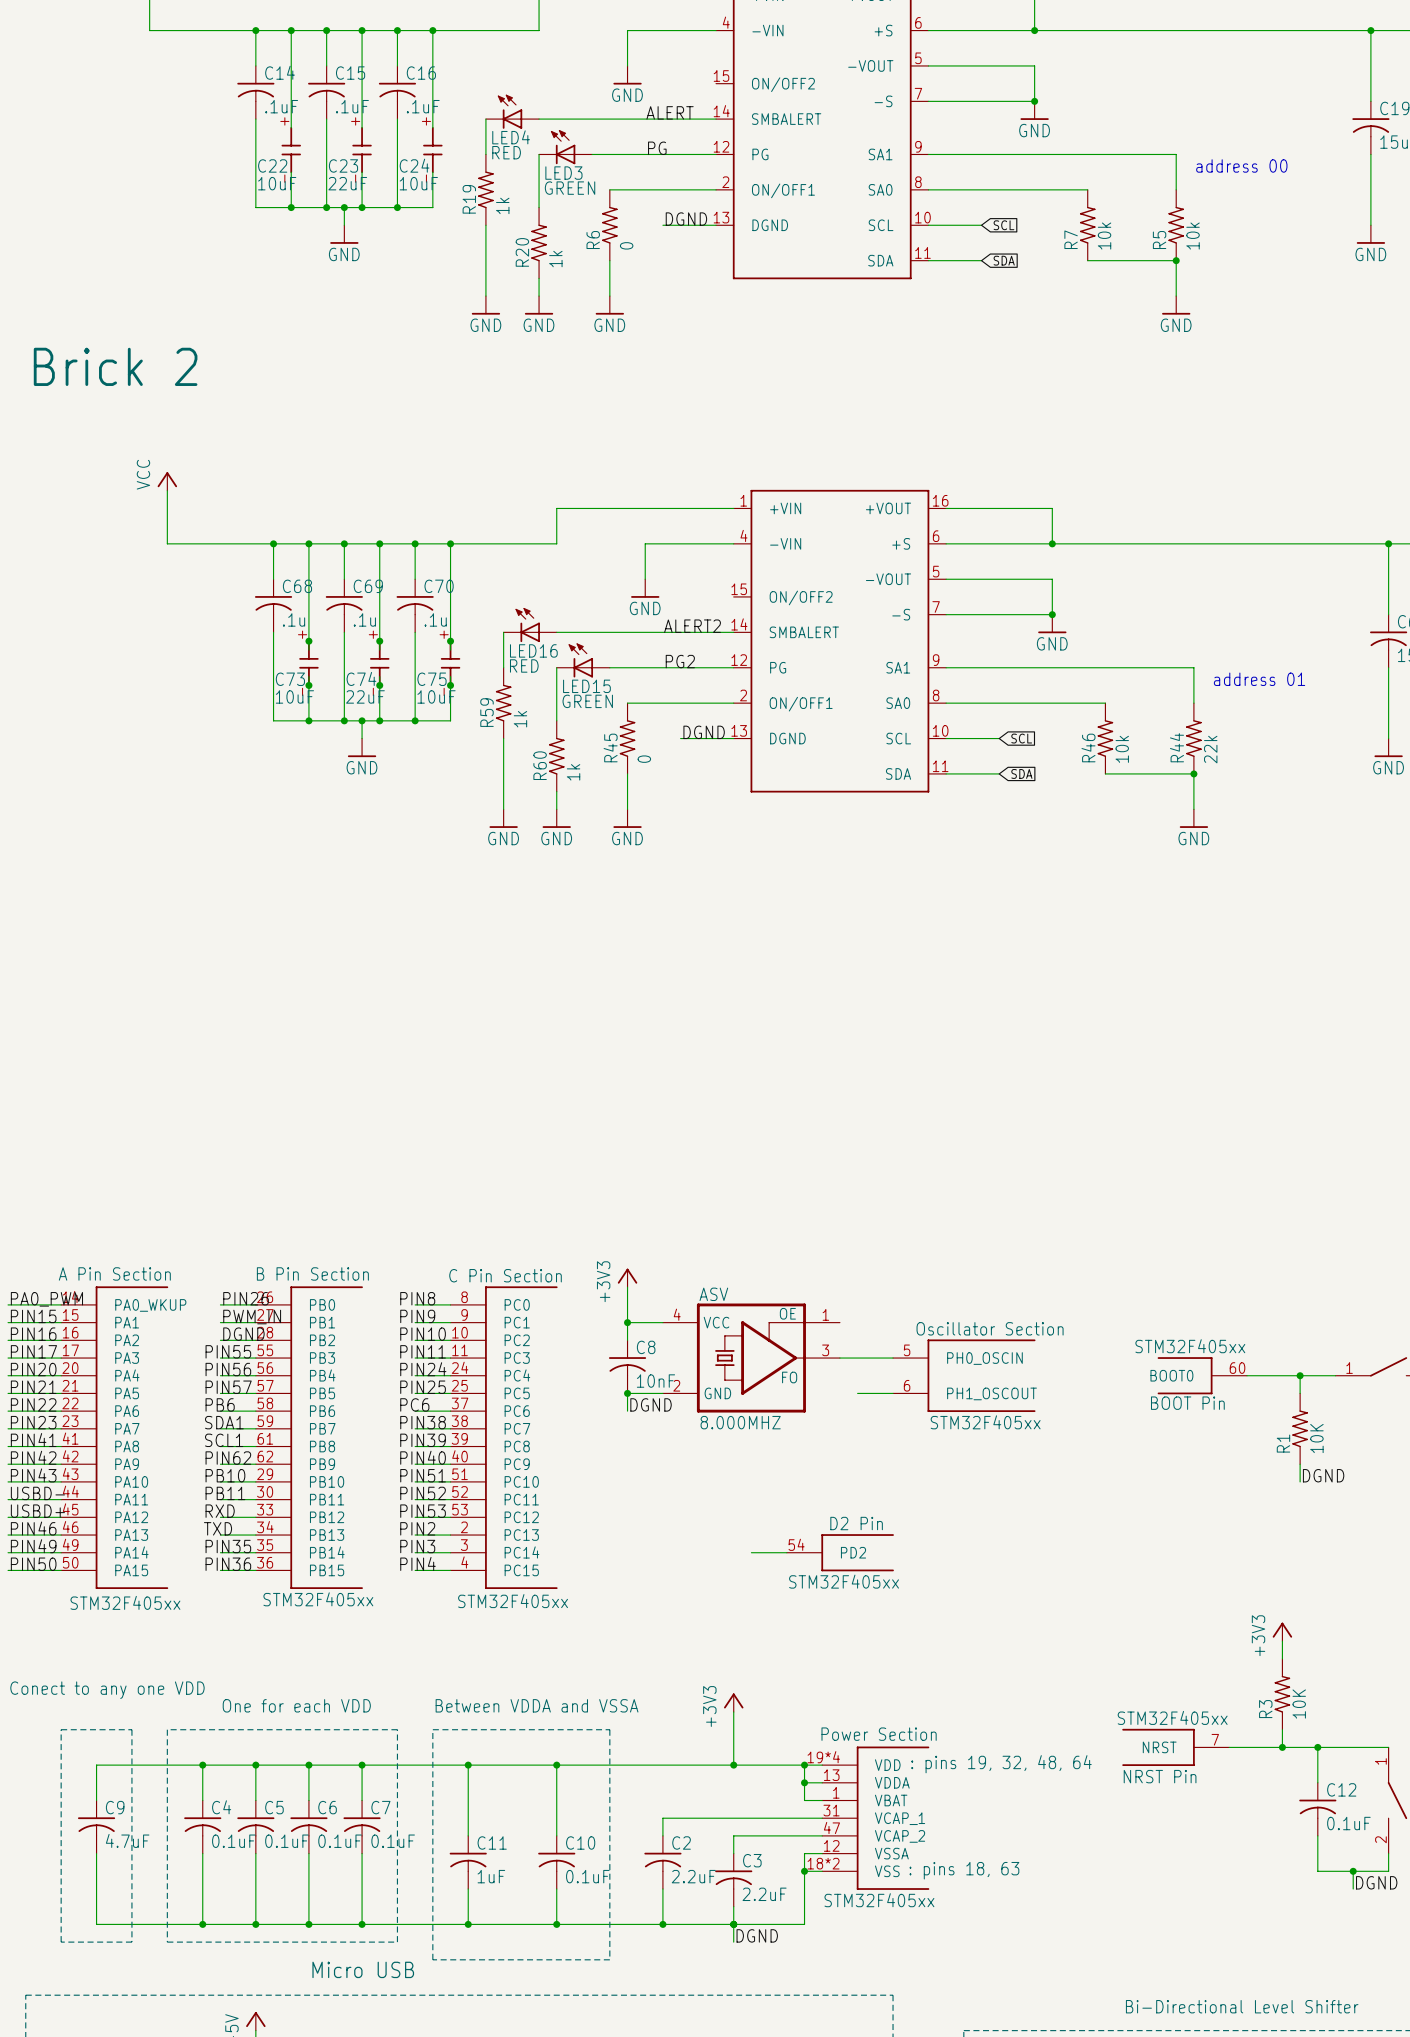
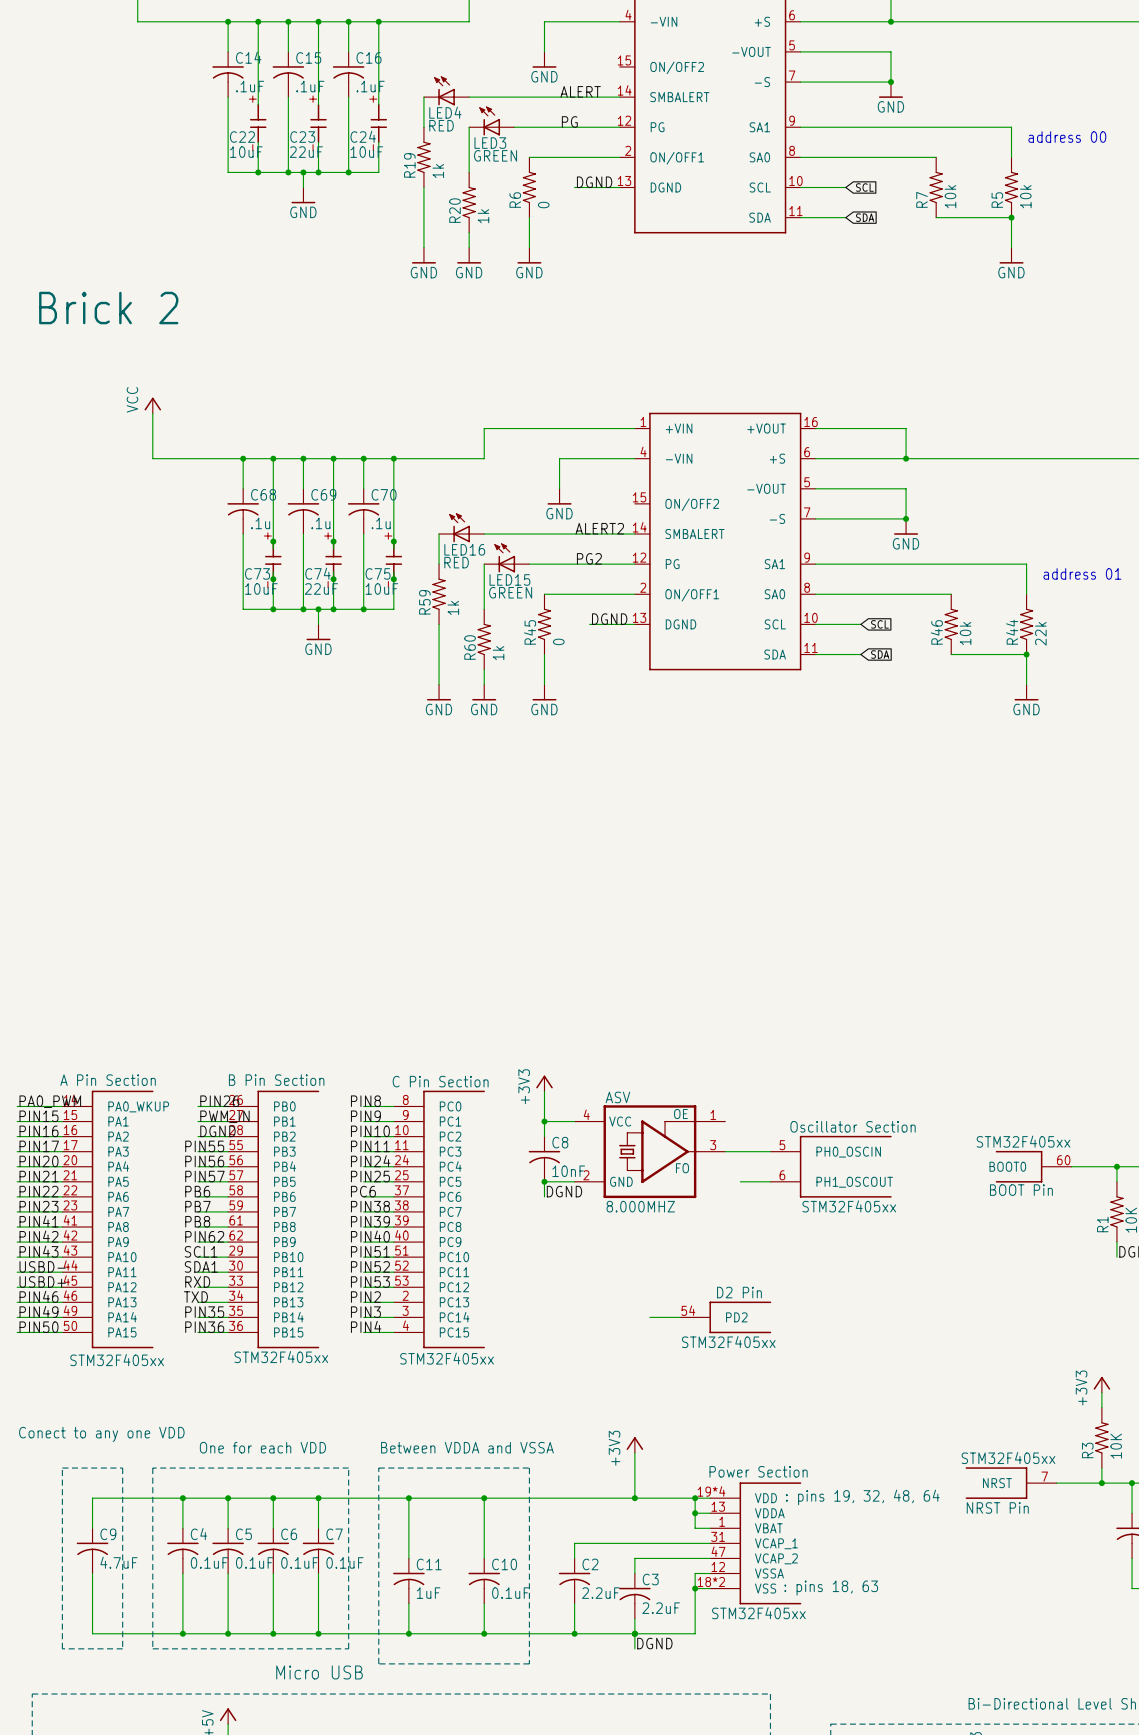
label: SDA1 (224, 1422) -> PB7 (197, 1206)
label: SCL1 (224, 1440) -> PB8 (197, 1221)
label: PB10 (225, 1475) -> SCL1 (201, 1251)
label: PB11 (225, 1493) -> SDA1 (201, 1266)

